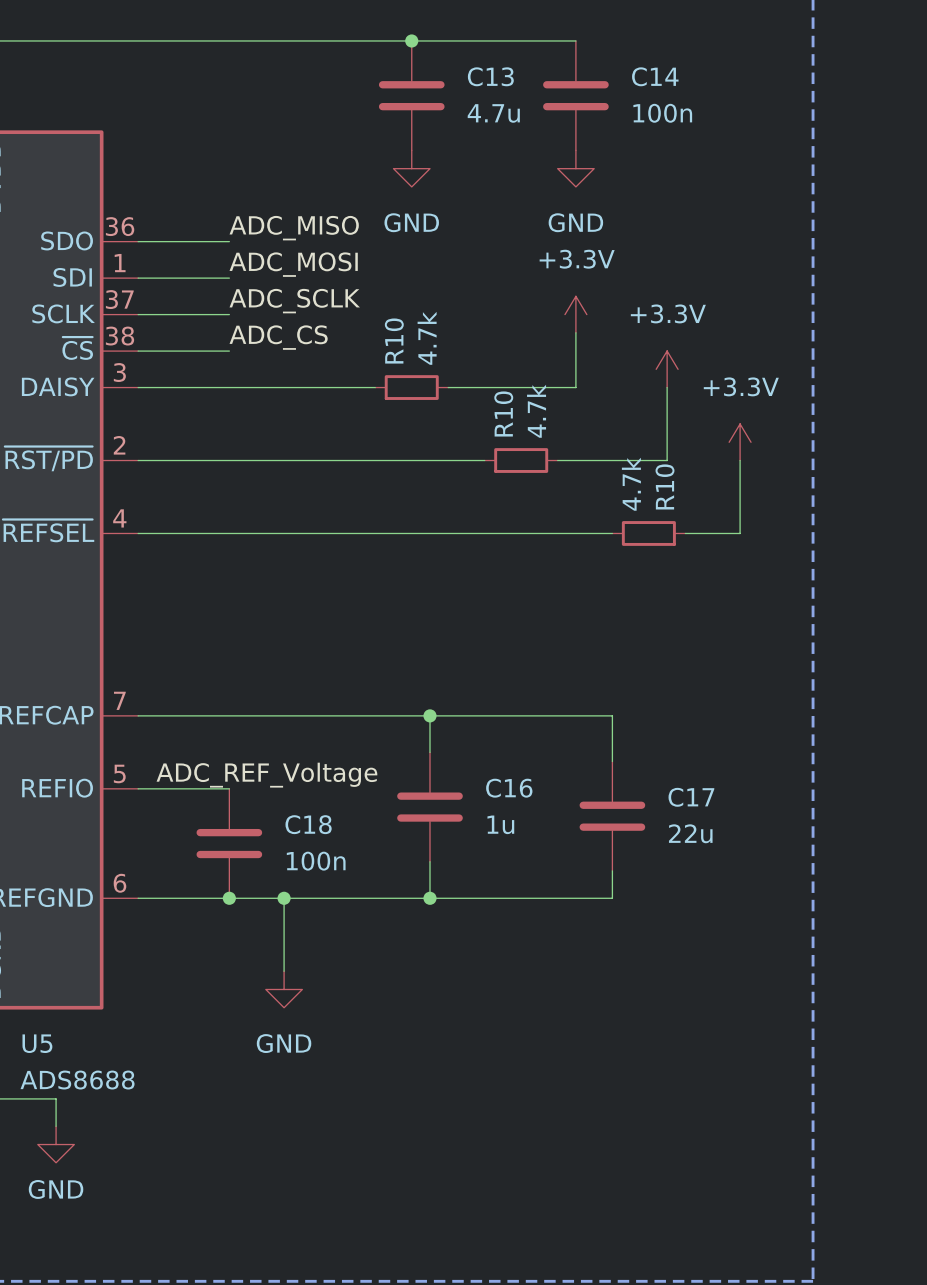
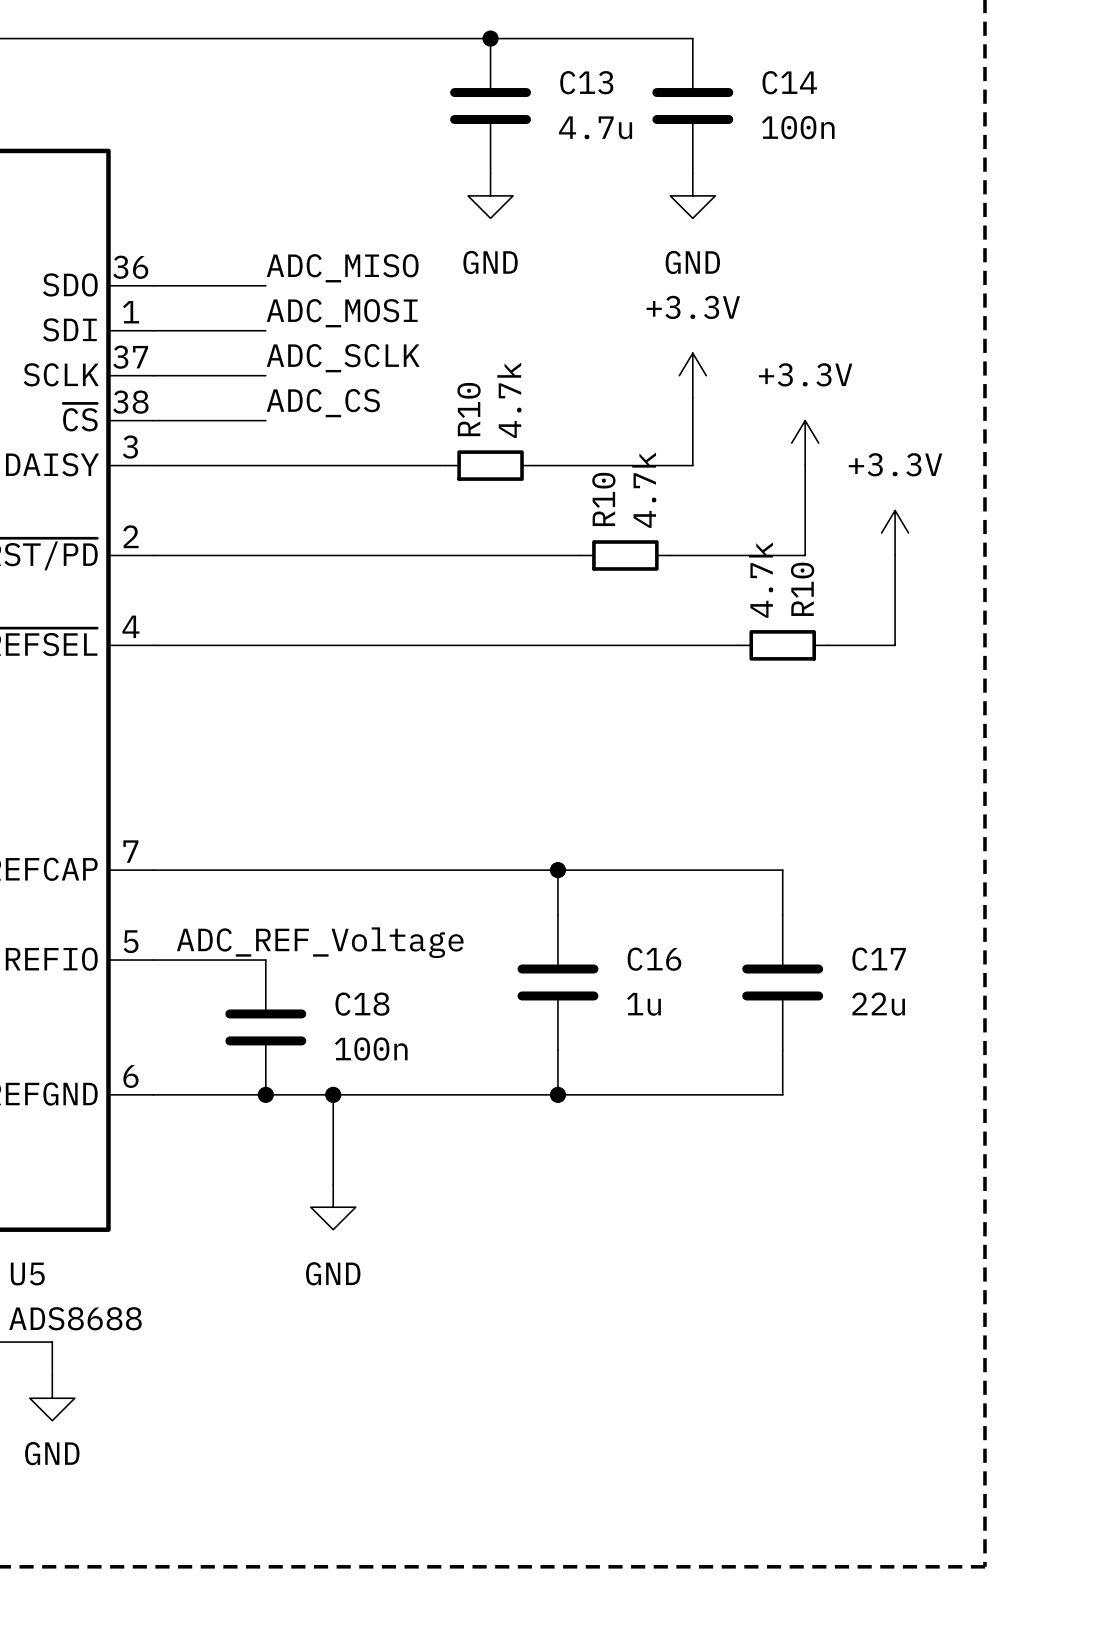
wire: (429, 715) (429, 752) -> (557, 870) (557, 915)
junction position: (429, 715) -> (557, 870)
wire: (612, 715) (612, 761) -> (737, 870) (782, 870) (782, 915)
C16 position: (429, 807) -> (557, 982)
C17 position: (612, 816) -> (782, 982)
wire: (429, 861) (429, 898) -> (557, 1049) (557, 1094)
wire: (612, 870) (612, 898) -> (782, 1049) (782, 1094) (737, 1094)
junction position: (429, 898) -> (557, 1094)

